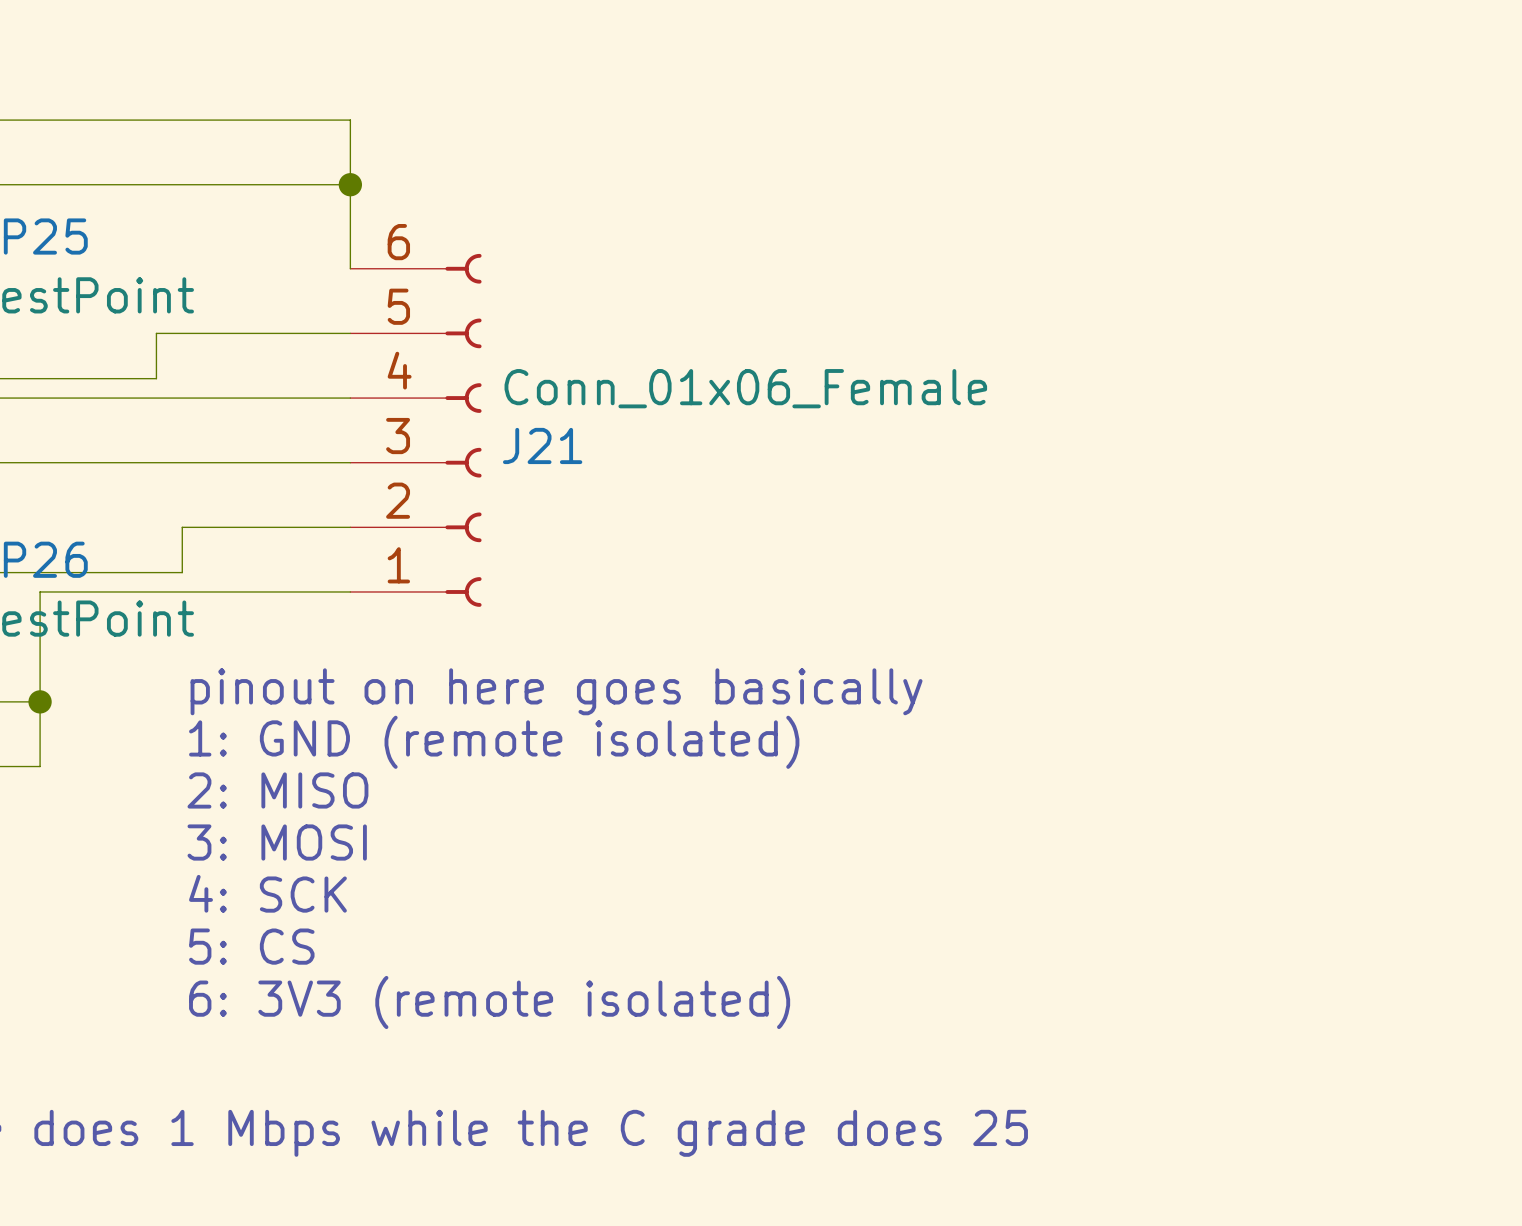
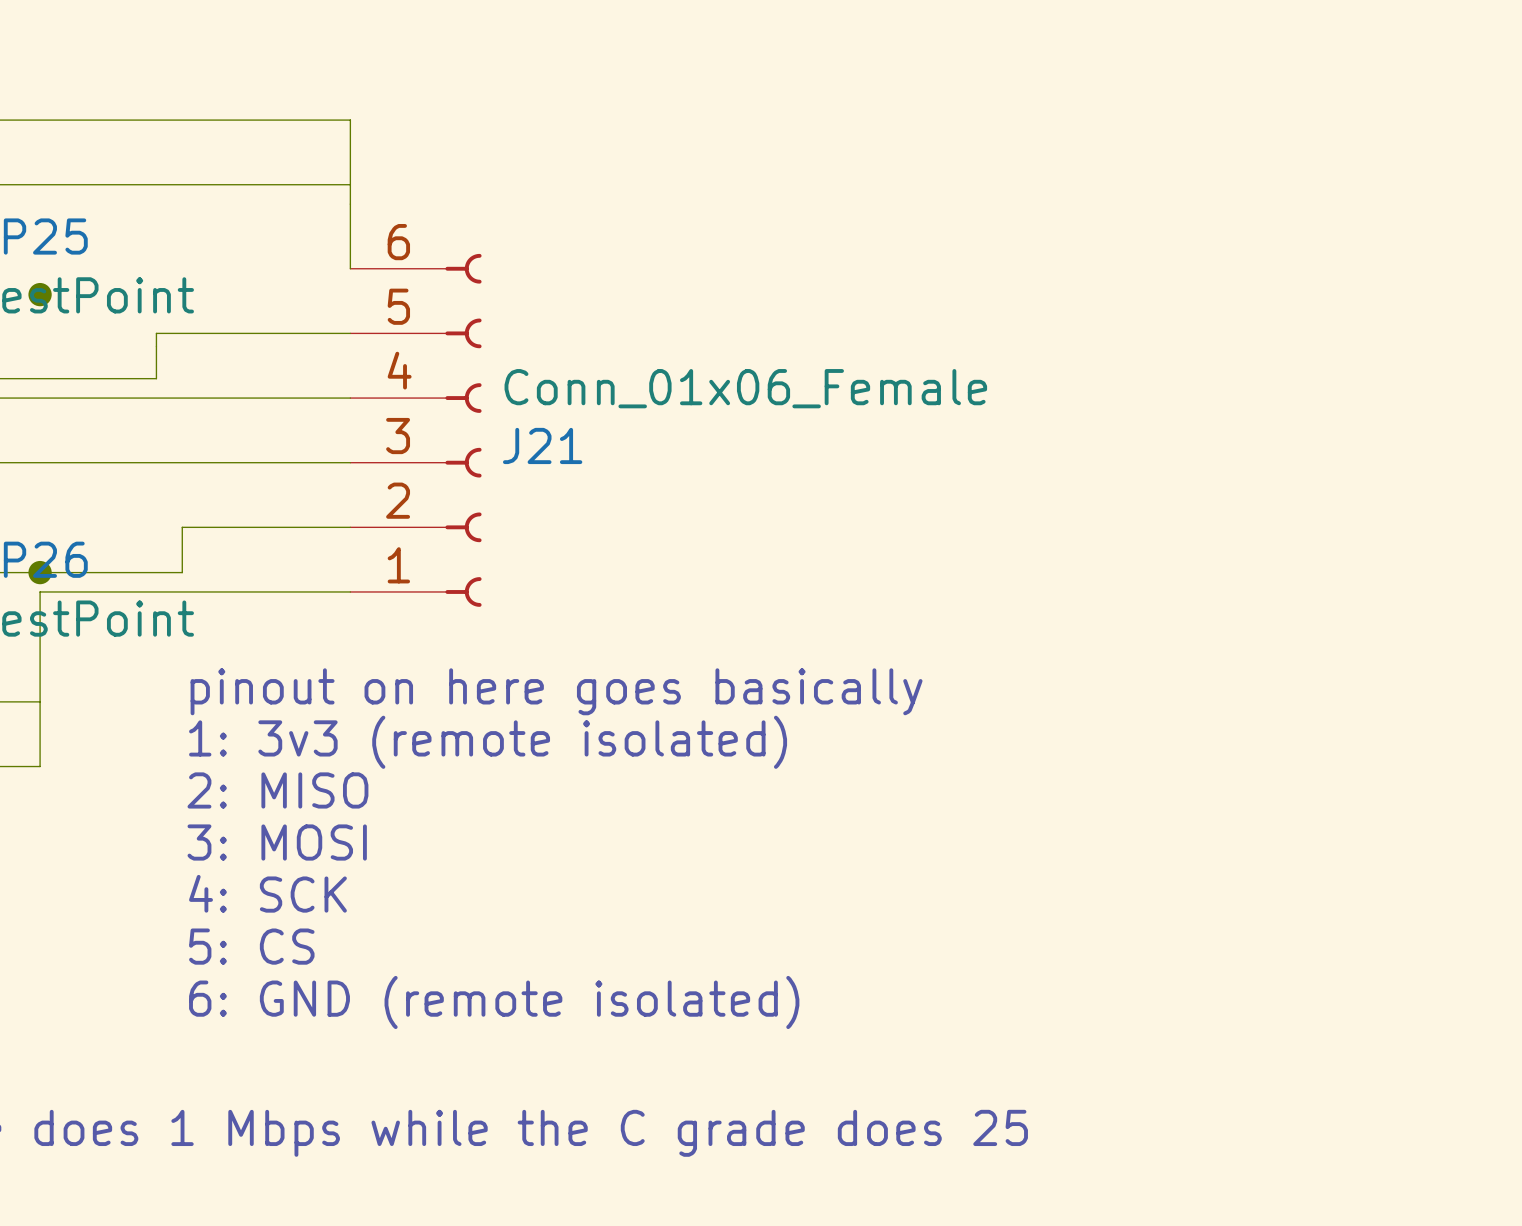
junction: (350, 184) -> none
junction: none -> (40, 294)
junction position: (40, 701) -> (40, 572)
text: 1: GND (remote isolated) (494, 742) -> 1: 3v3 (remote isolated) (488, 742)
text: 6: 3V3 (remote isolated) (489, 1002) -> 6: GND (remote isolated) (494, 1002)

